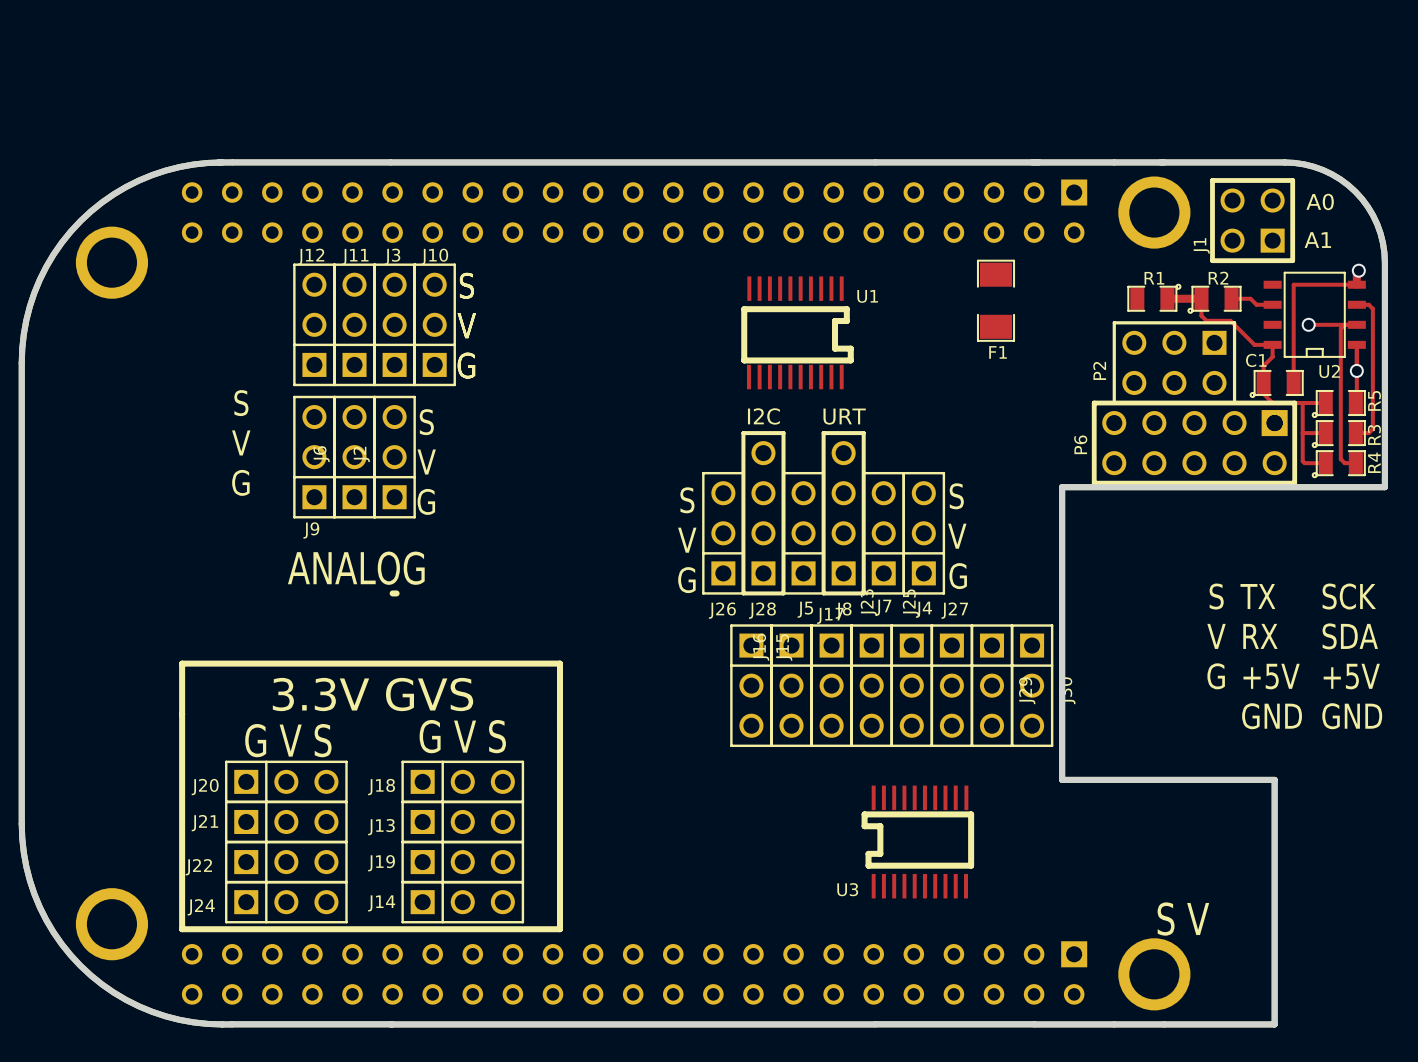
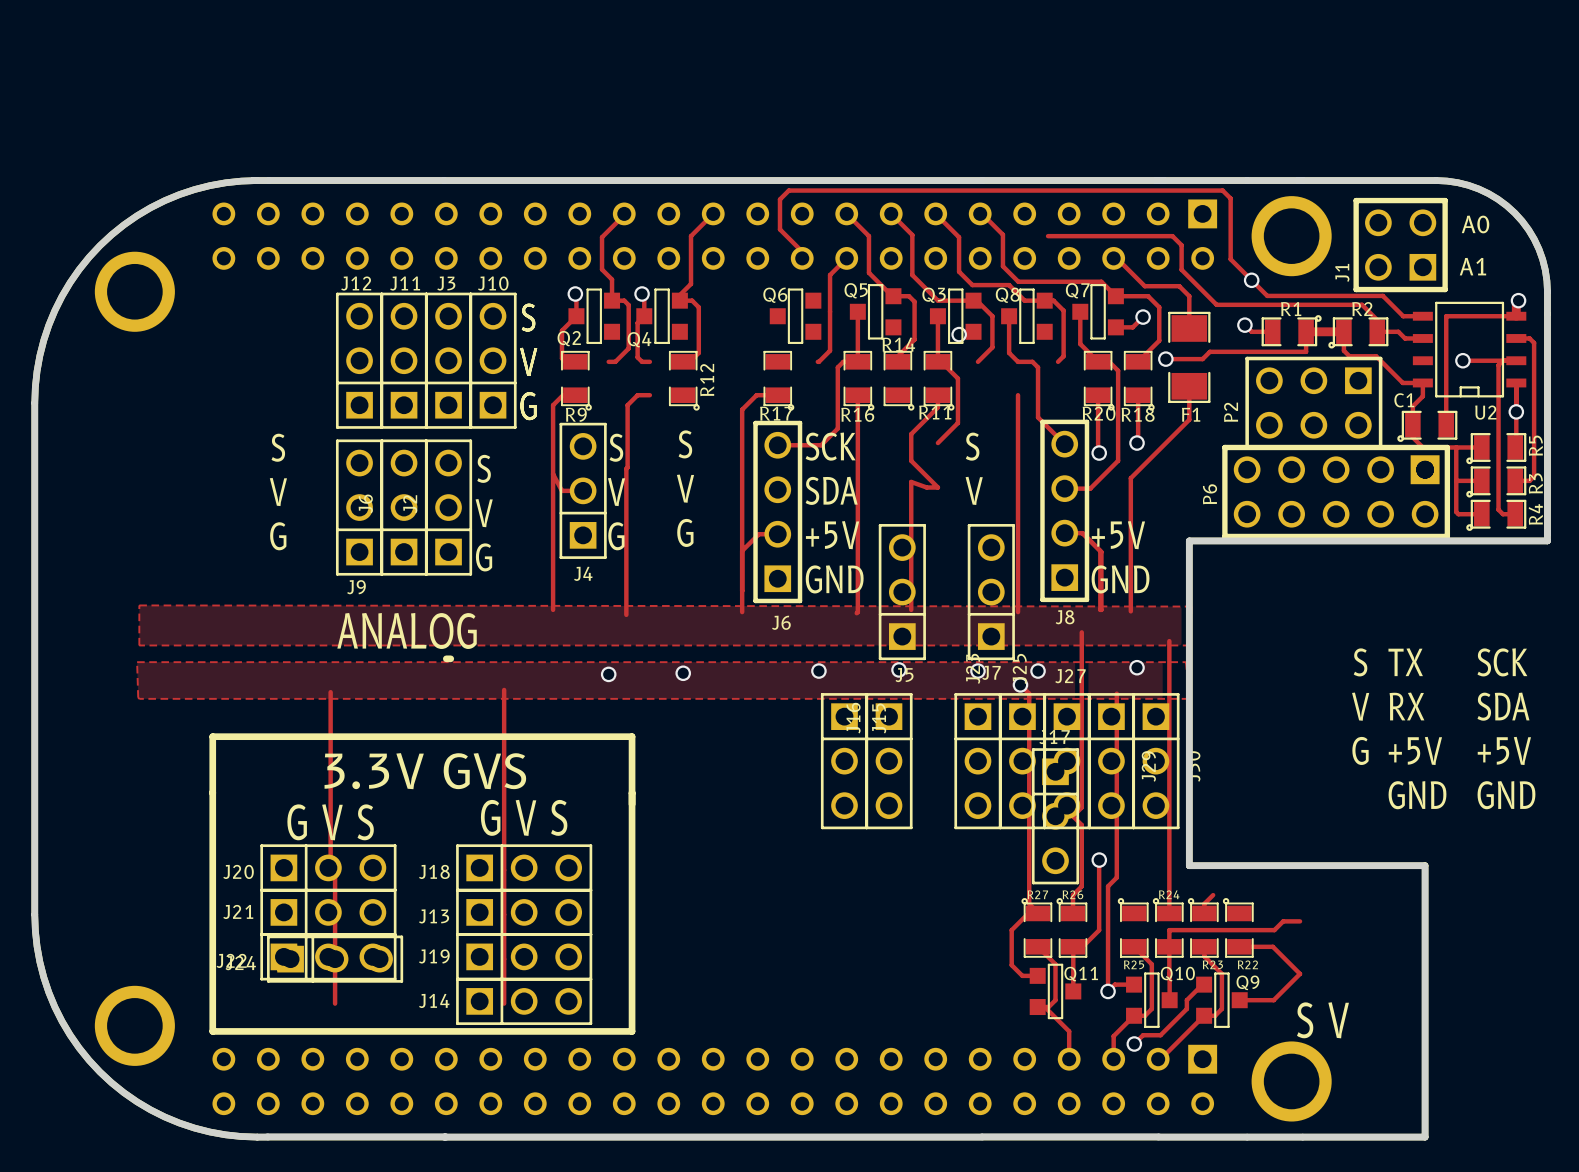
track: none -> (624, 213) (602, 237) (602, 269) (612, 279) (612, 300) (624, 300) (628, 305) (628, 348) (615, 361) (608, 361)
track: none -> (713, 213) (691, 236) (691, 283) (679, 295) (679, 300) (692, 300) (698, 307) (698, 352) (689, 361) (683, 361)
track: none -> (846, 213) (868, 236) (868, 272) (892, 296) (909, 296) (914, 301) (914, 339) (897, 356) (897, 361)
track: none -> (891, 213) (912, 235) (912, 275) (937, 300) (976, 300) (992, 316) (992, 347) (977, 361)
track: none -> (935, 213) (959, 237) (959, 271) (972, 285) (1009, 285) (1024, 300) (1053, 300) (1063, 310) (1063, 356) (1058, 361)
track: none -> (980, 213) (1002, 234) (1002, 266) (1018, 281) (1101, 281) (1115, 296) (1148, 296) (1159, 307) (1159, 340) (1138, 361)
track: none -> (1048, 236) (1172, 236) (1181, 245) (1181, 269) (1216, 304) (1362, 304) (1377, 320)
track: none -> (802, 258) (802, 251) (779, 229) (779, 199) (788, 190) (1222, 190) (1230, 198) (1230, 259) (1267, 295) (1382, 295) (1403, 316) (1422, 316)
track: none -> (846, 258) (830, 275) (830, 350) (817, 361)
track: none -> (1113, 258) (1117, 258) (1144, 286) (1179, 286) (1189, 296) (1189, 328)
via: none -> (1251, 280)
track: none -> (575, 293) (576, 316) (561, 330) (561, 358) (565, 361) (575, 361)
via: none -> (575, 293)
track: none -> (642, 293) (644, 296) (644, 316) (637, 322) (637, 357) (642, 361) (649, 361)
via: none -> (642, 293)
track: none -> (857, 311) (857, 361) (843, 361) (837, 367) (837, 428) (821, 445) (777, 445)
Q5: none -> (875, 311)
track: none -> (1080, 311) (1080, 344) (1098, 361) (1109, 361) (1118, 370) (1118, 460) (1090, 488) (1064, 488)
Q7: none -> (1098, 311)
Q2: none -> (594, 316)
Q4: none -> (662, 316)
Q6: none -> (795, 316)
track: none -> (937, 316) (937, 361) (941, 361) (957, 378) (957, 423) (937, 443)
Q3: none -> (955, 316)
track: none -> (1009, 316) (1009, 352) (1018, 361) (1032, 361) (1038, 367) (1038, 417) (1064, 444)
Q8: none -> (1026, 316)
track: none -> (1143, 317) (1132, 327) (1115, 327)
via: none -> (1143, 317)
track: none -> (1244, 325) (1251, 331) (1272, 331)
via: none -> (1244, 325)
track: none -> (1306, 331) (1306, 351) (1209, 351) (1202, 359) (1165, 359)
F1 position: (996, 300) -> (1189, 357)
via: none -> (959, 334)
via: none -> (1165, 359)
U1: (797, 332) -> none
R9: none -> (576, 380)
R12: none -> (684, 380)
R17: none -> (778, 380)
R16: none -> (858, 380)
R14: none -> (899, 380)
R11: none -> (939, 380)
R20: none -> (1099, 380)
R18: none -> (1139, 380)
track: none -> (1189, 386) (1189, 419) (1130, 478) (1130, 611)
track: none -> (575, 395) (563, 395) (553, 405) (553, 609)
track: none -> (649, 395) (637, 395) (627, 405) (626, 614)
track: none -> (777, 395) (756, 395) (742, 409) (742, 612)
track: none -> (857, 395) (856, 613)
track: none -> (937, 395) (937, 407) (911, 434) (911, 460) (937, 487) (926, 487) (911, 481) (911, 609)
track: none -> (1018, 395) (1018, 612)
track: none -> (1098, 395) (1099, 453)
track: none -> (1138, 395) (1137, 443)
via: none -> (1137, 443)
text: none -> S (685, 444)
text: none -> SCK (830, 446)
text: none -> S (972, 446)
text: none -> S (616, 447)
via: none -> (1099, 453)
text: I2C (763, 416) -> none
text: URT (844, 416) -> none
track: none -> (553, 474) (561, 490) (583, 490)
text: none -> V (685, 488)
text: none -> SDA (831, 490)
text: none -> V (974, 490)
text: none -> V (616, 492)
J6: none -> (777, 511)
text: none -> G (685, 532)
track: none -> (1064, 533) (1082, 533) (1101, 552) (1101, 609) (1100, 609) (1100, 550)
track: none -> (777, 534) (758, 534) (742, 550)
text: none -> G (616, 536)
text: none -> +5V (832, 535)
text: none -> +5V (1118, 535)
text: S (956, 496) -> none
text: S (687, 500) -> none
J28: (763, 513) -> none
J8 position: (843, 513) -> (1064, 510)
text: none -> GND (834, 579)
text: none -> GND (1120, 579)
J26: (723, 533) -> none
J4 position: (923, 533) -> (583, 490)
text: V (957, 536) -> none
text: V (687, 540) -> none
zone outline: none -> (139, 605) (1191, 606) (1190, 645) (139, 645) (139, 605)
track: none -> (1081, 632) (1081, 807) (1073, 816) (1081, 825) (1081, 886) (1073, 895) (1073, 913)
text: G (958, 576) -> none
track: none -> (1169, 641) (1169, 913)
text: G (686, 580) -> none
zone outline: none -> (137, 662) (1185, 662) (1189, 698) (139, 698) (137, 662)
via: none -> (1137, 667)
via: none -> (899, 669)
via: none -> (818, 671)
via: none -> (977, 671)
via: none -> (1038, 671)
via: none -> (683, 673)
via: none -> (608, 674)
track: none -> (1020, 684) (1029, 693) (1029, 903) (1037, 913) (1028, 913) (1011, 930) (1011, 965) (1022, 975) (1037, 975)
via: none -> (1020, 684)
track: none -> (504, 689) (504, 1003)
track: none -> (330, 692) (330, 865) (335, 870) (335, 1003)
track: none -> (1116, 693) (1116, 877) (1108, 886) (1108, 991) (1114, 984) (1134, 984)
J17 position: (831, 685) -> (1055, 816)
track: none -> (1099, 860) (1099, 930) (1082, 946) (1073, 946) (1073, 991)
via: none -> (1099, 860)
track: none -> (1213, 895) (1204, 903) (1204, 913)
track: none -> (1300, 921) (1283, 921) (1274, 930) (1169, 930) (1169, 1000)
R27: none -> (1036, 927)
R26: none -> (1071, 927)
R25: none -> (1133, 927)
R24: none -> (1168, 927)
R23: none -> (1203, 927)
R22: none -> (1238, 927)
U3: (917, 842) -> none
track: none -> (1037, 946) (1055, 964) (1055, 1000) (1048, 1007) (1037, 1007)
track: none -> (1134, 946) (1151, 964) (1151, 1008) (1145, 1015) (1134, 1015) (1113, 1036) (1113, 1059)
track: none -> (1204, 946) (1204, 956) (1221, 973) (1221, 1008) (1215, 1015) (1204, 1015) (1160, 1059) (1158, 1059)
track: none -> (1239, 946) (1272, 946) (1300, 973) (1273, 1000) (1239, 1000)
track: none -> (1204, 984) (1186, 1000) (1186, 1008) (1160, 1035) (1143, 1035) (1134, 1043)
Q11: none -> (1055, 991)
via: none -> (1108, 991)
Q10: none -> (1151, 1000)
Q9: none -> (1221, 1000)
J24 position: (286, 902) -> (335, 959)
track: none -> (1044, 1007) (1069, 1031) (1069, 1059)
via: none -> (1134, 1043)

